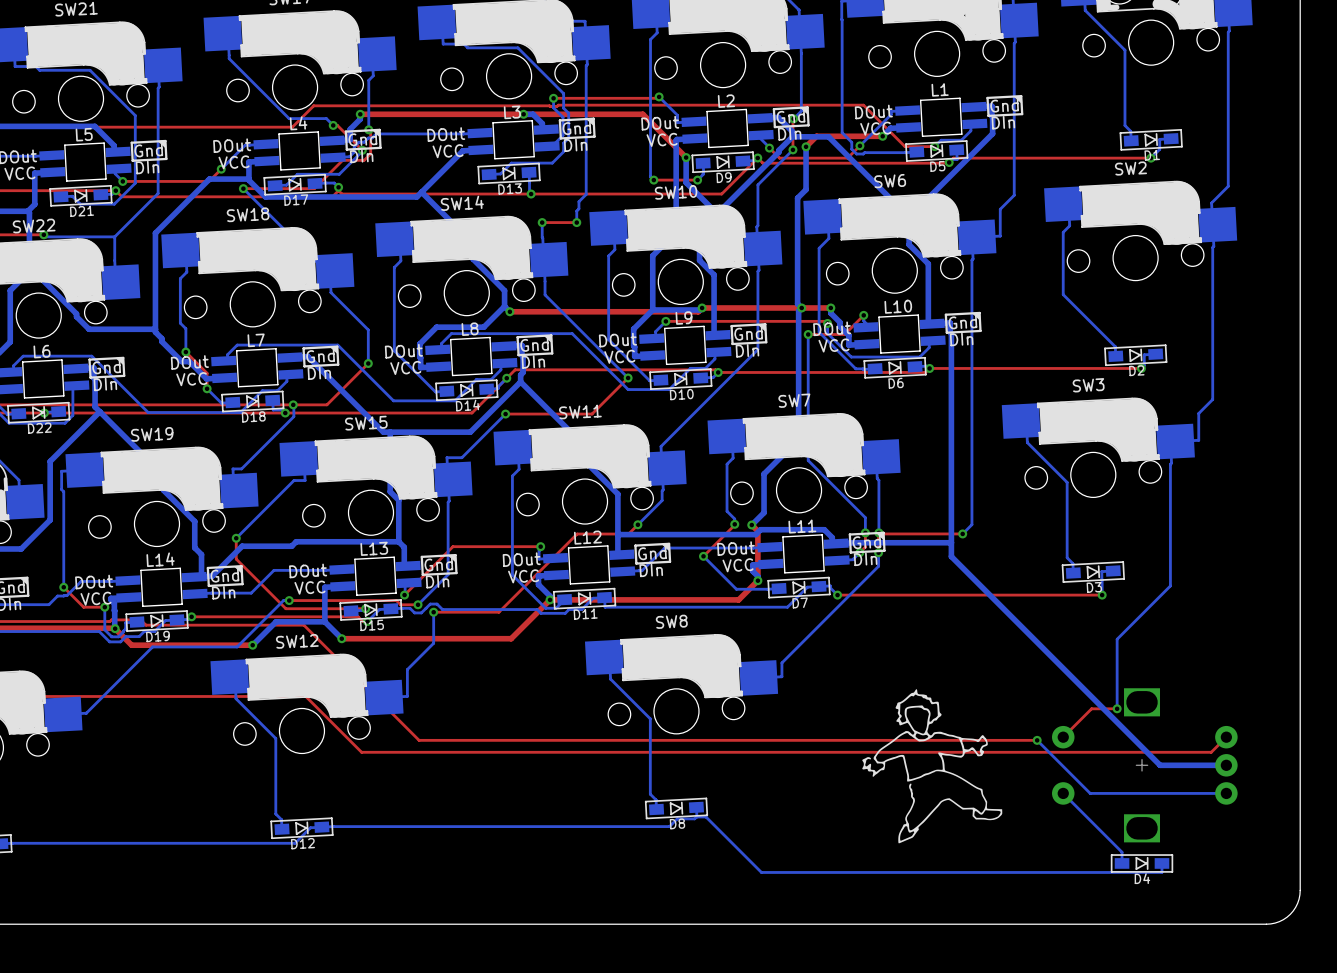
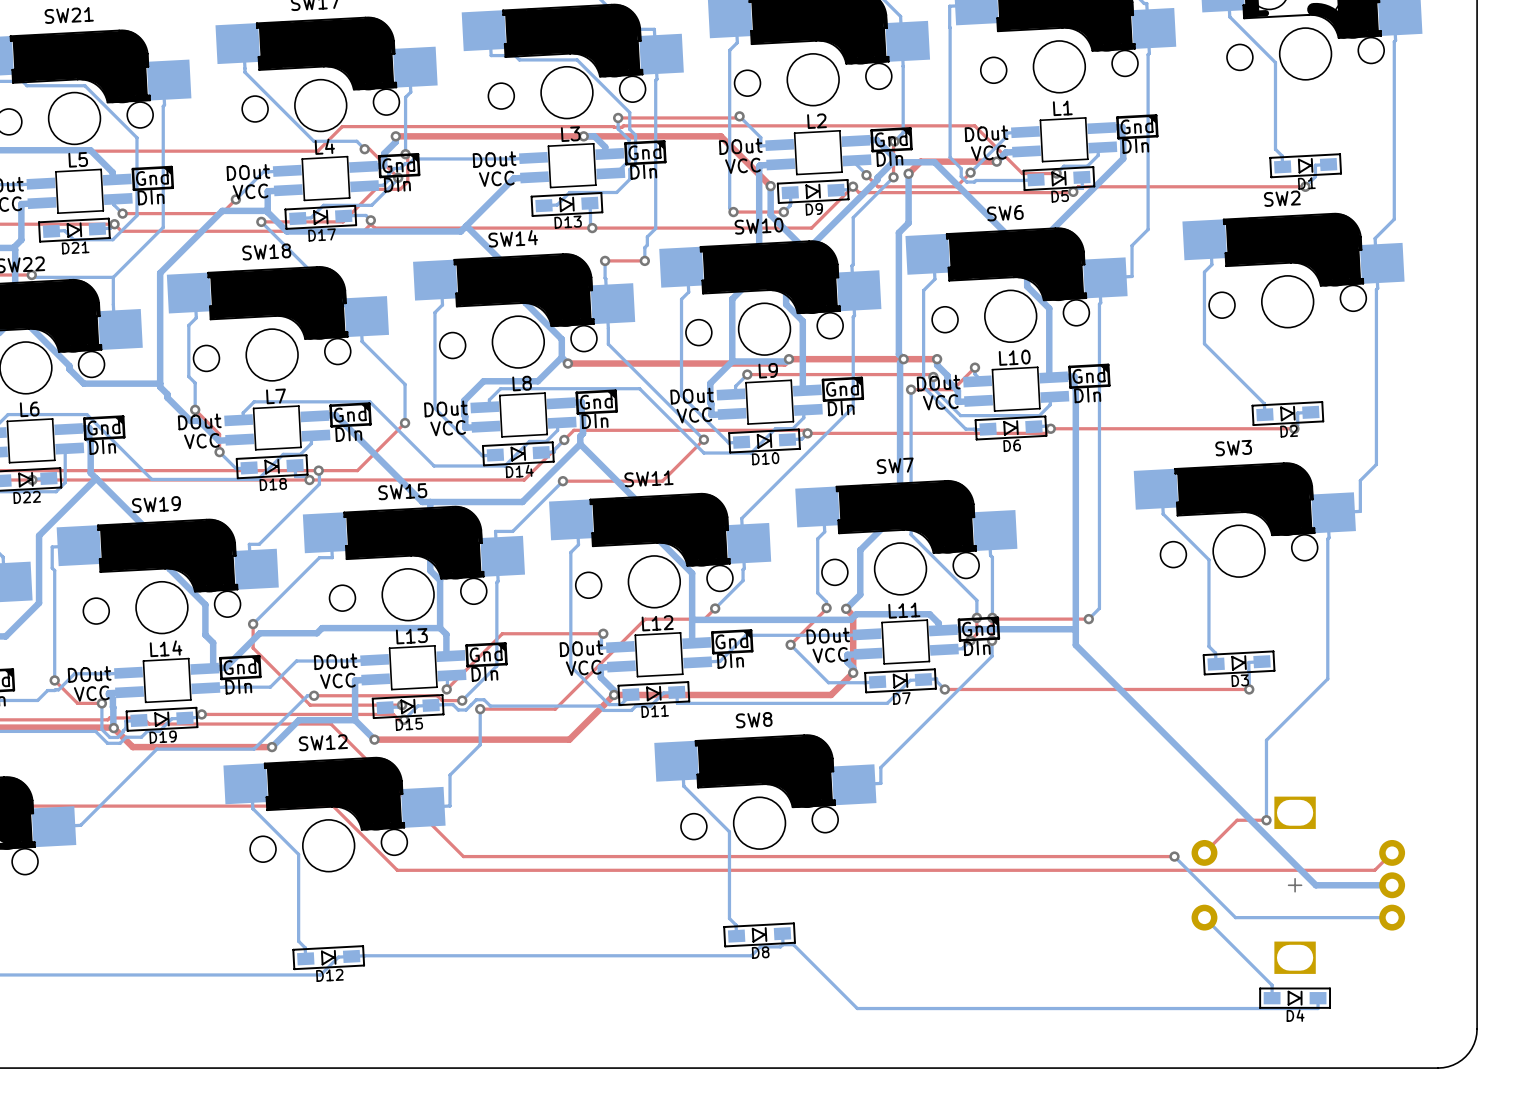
drawing: [862, 689, 1003, 844] -> none

